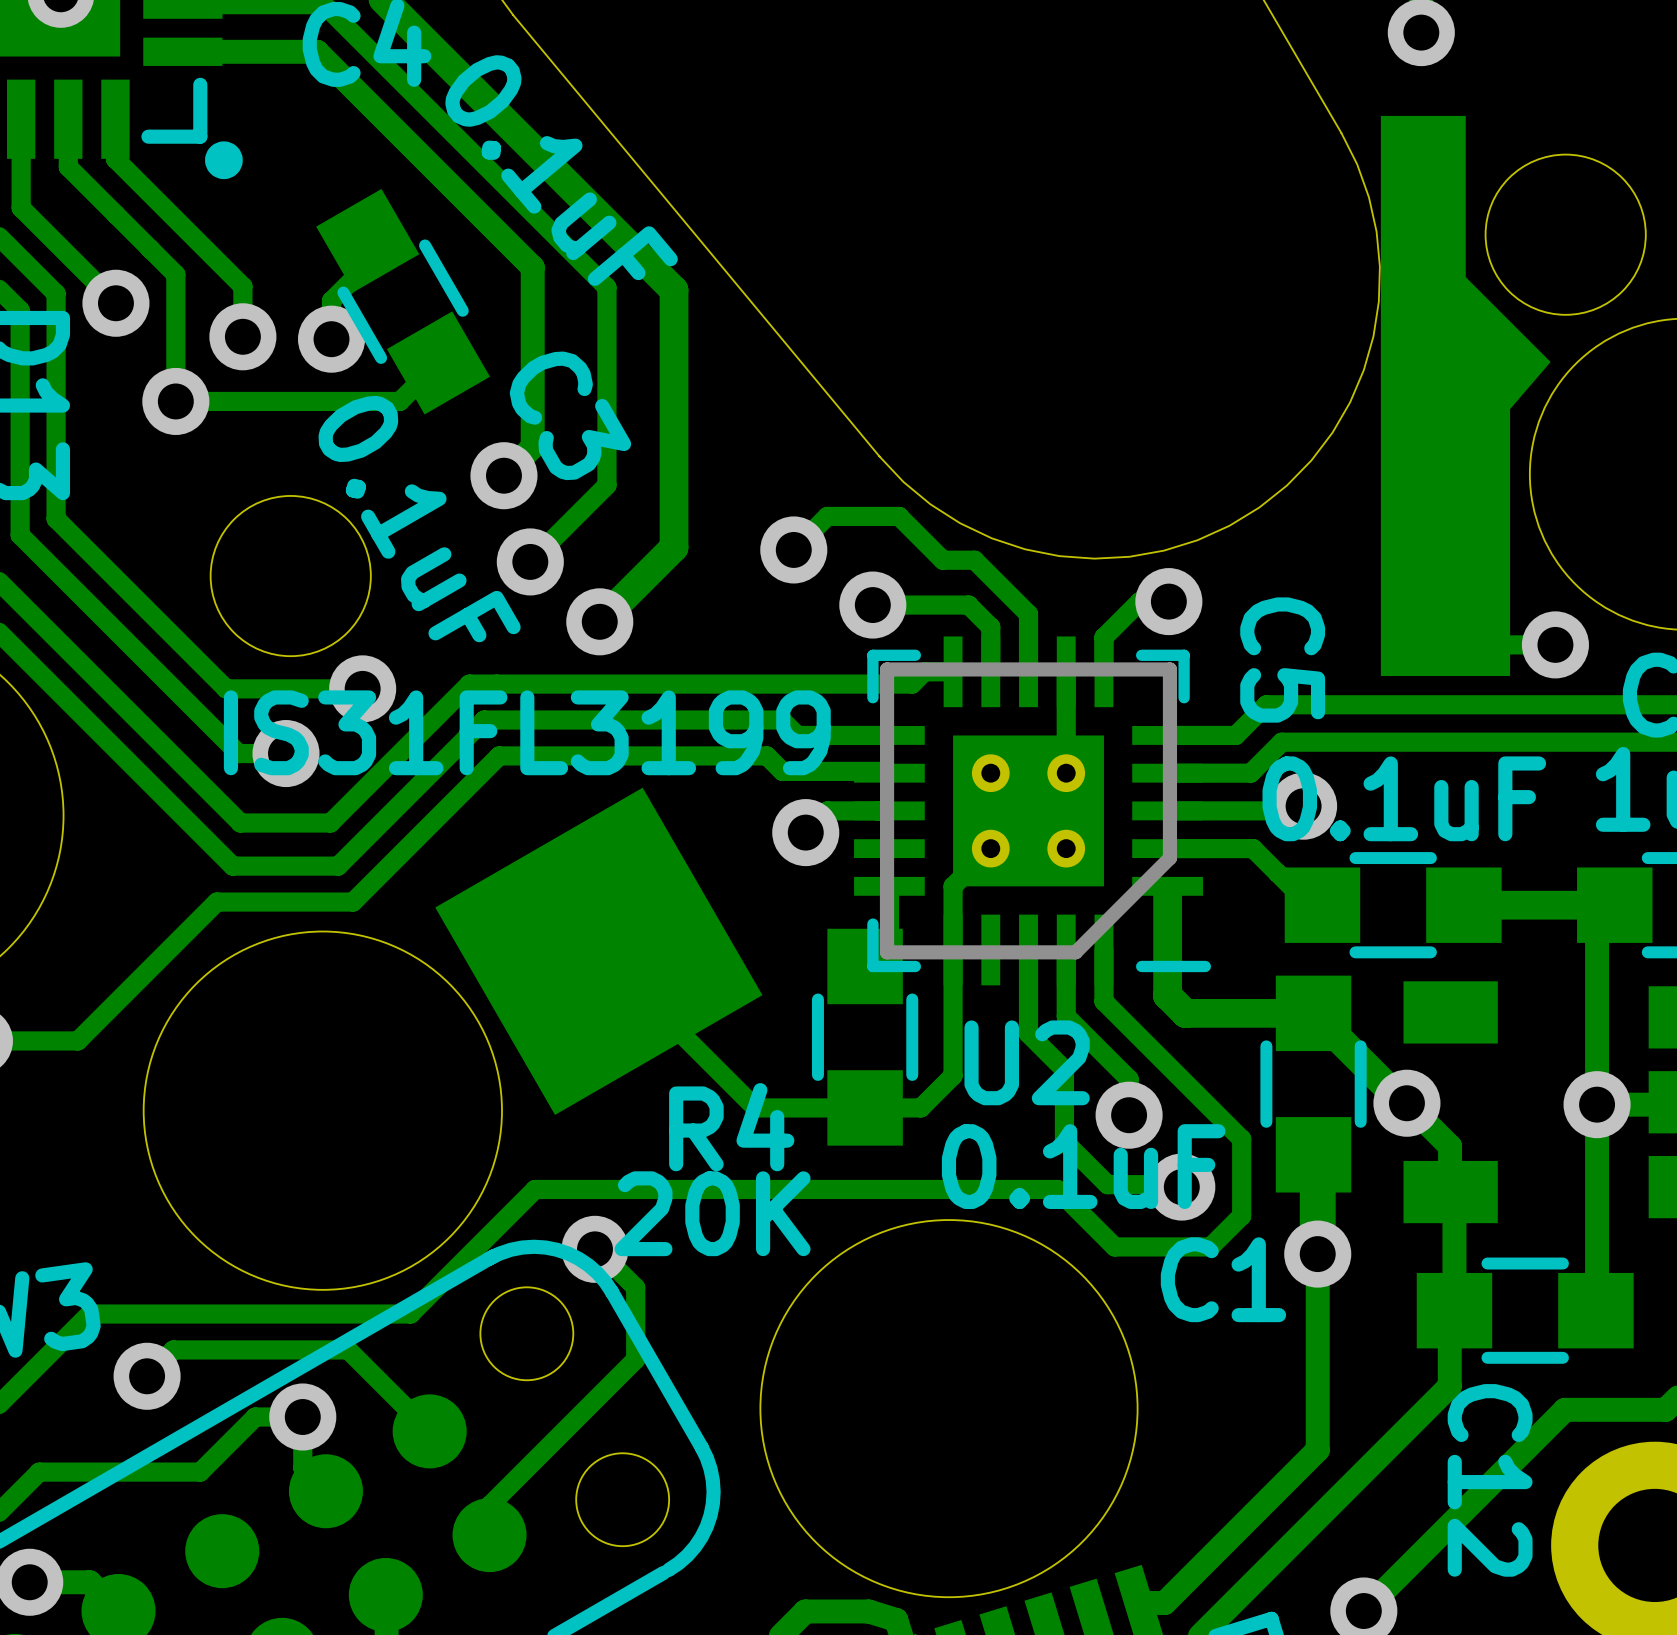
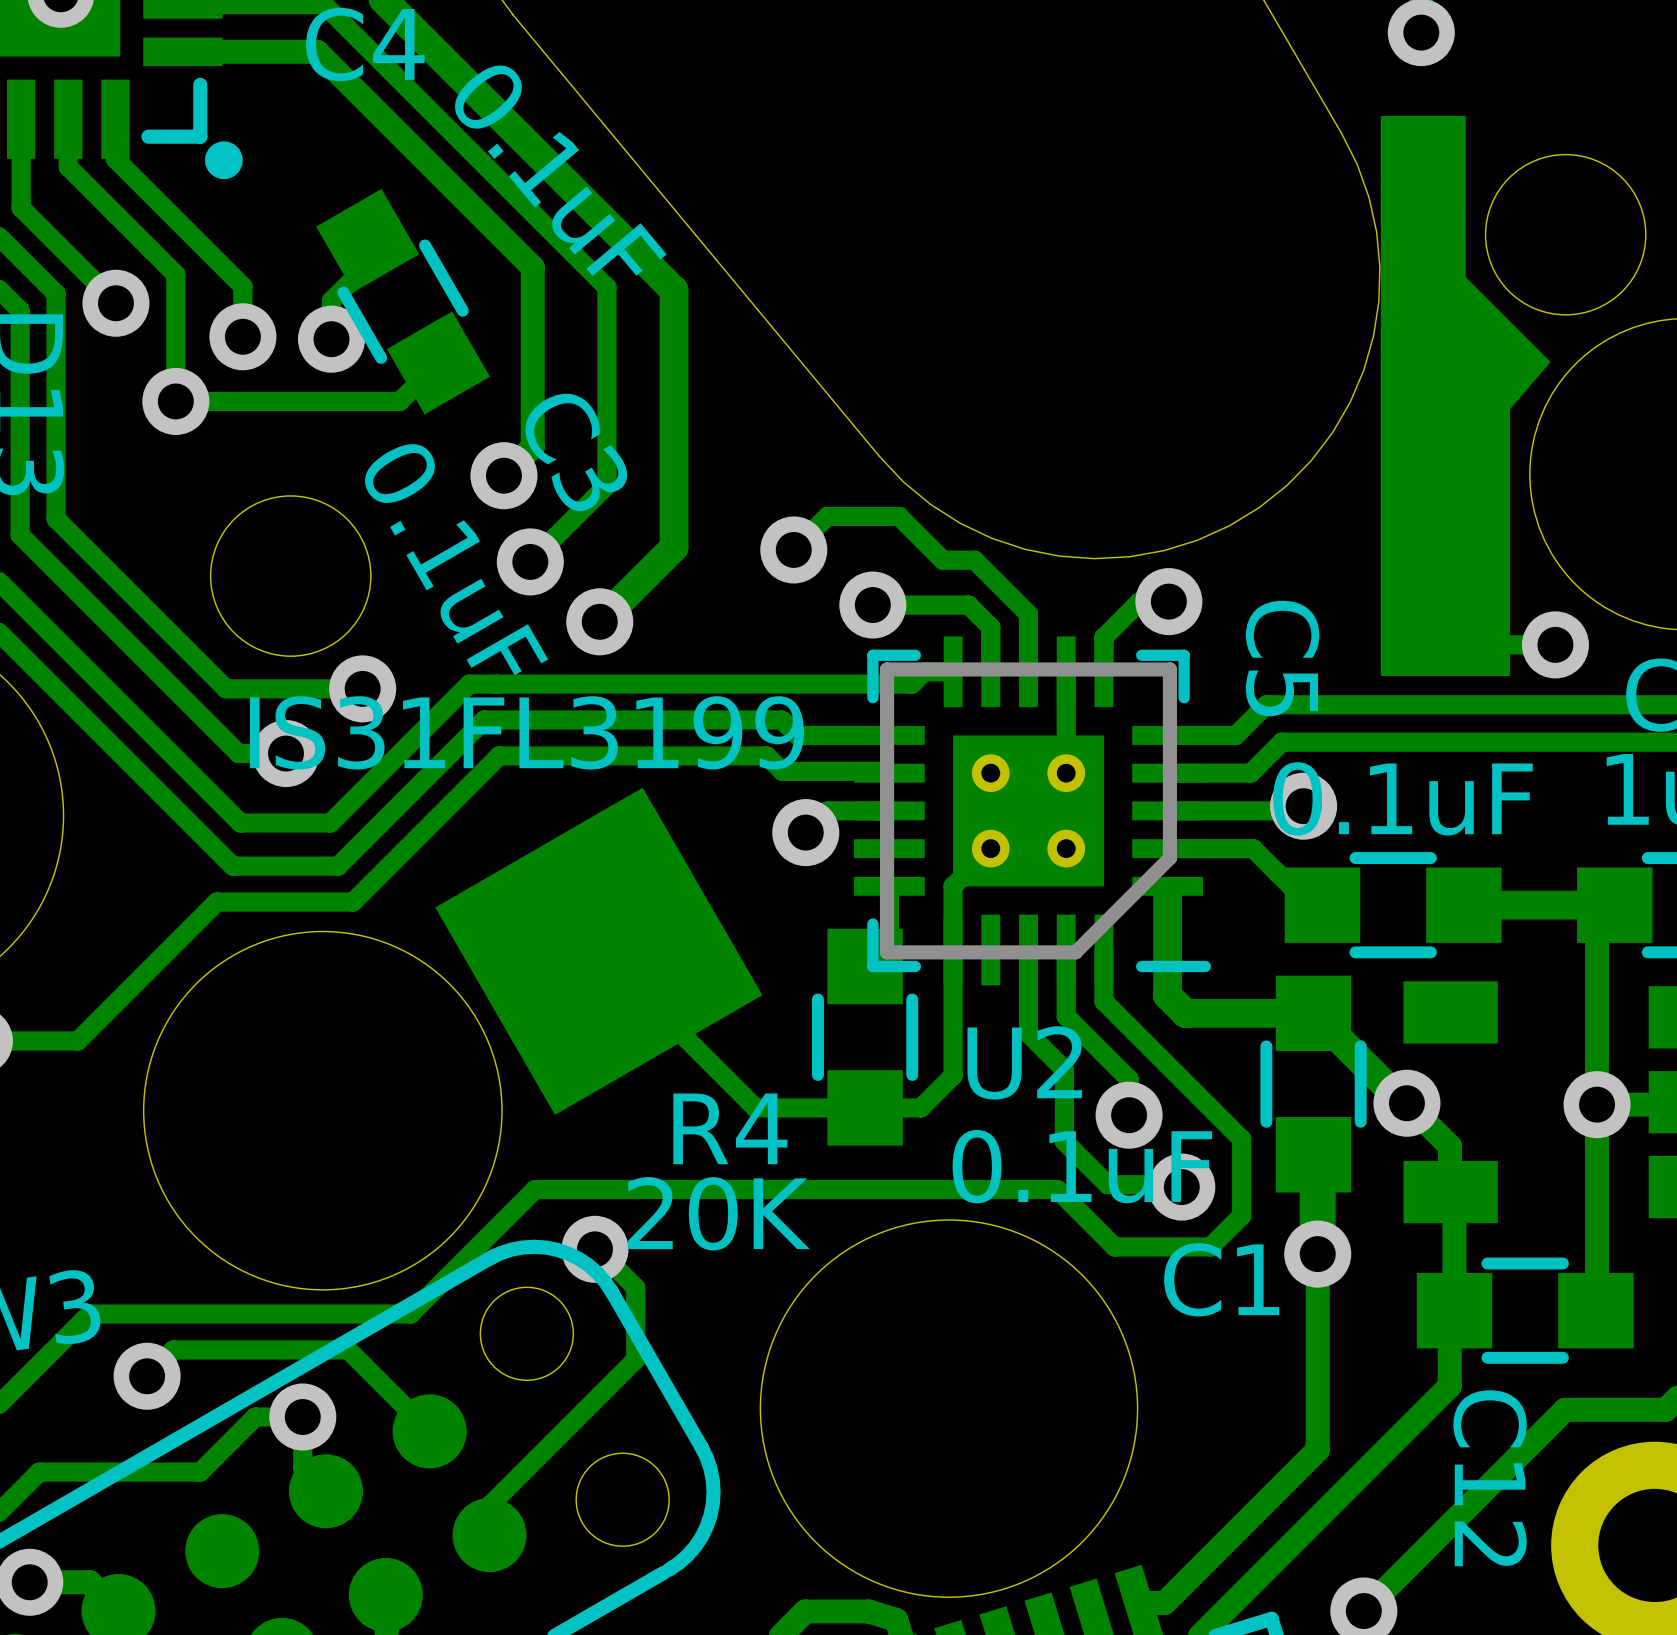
C3 name position: C3 (570, 415) -> C3 (575, 452)
C3 value position: 0.1uF (419, 519) -> 0.1uF (455, 559)

